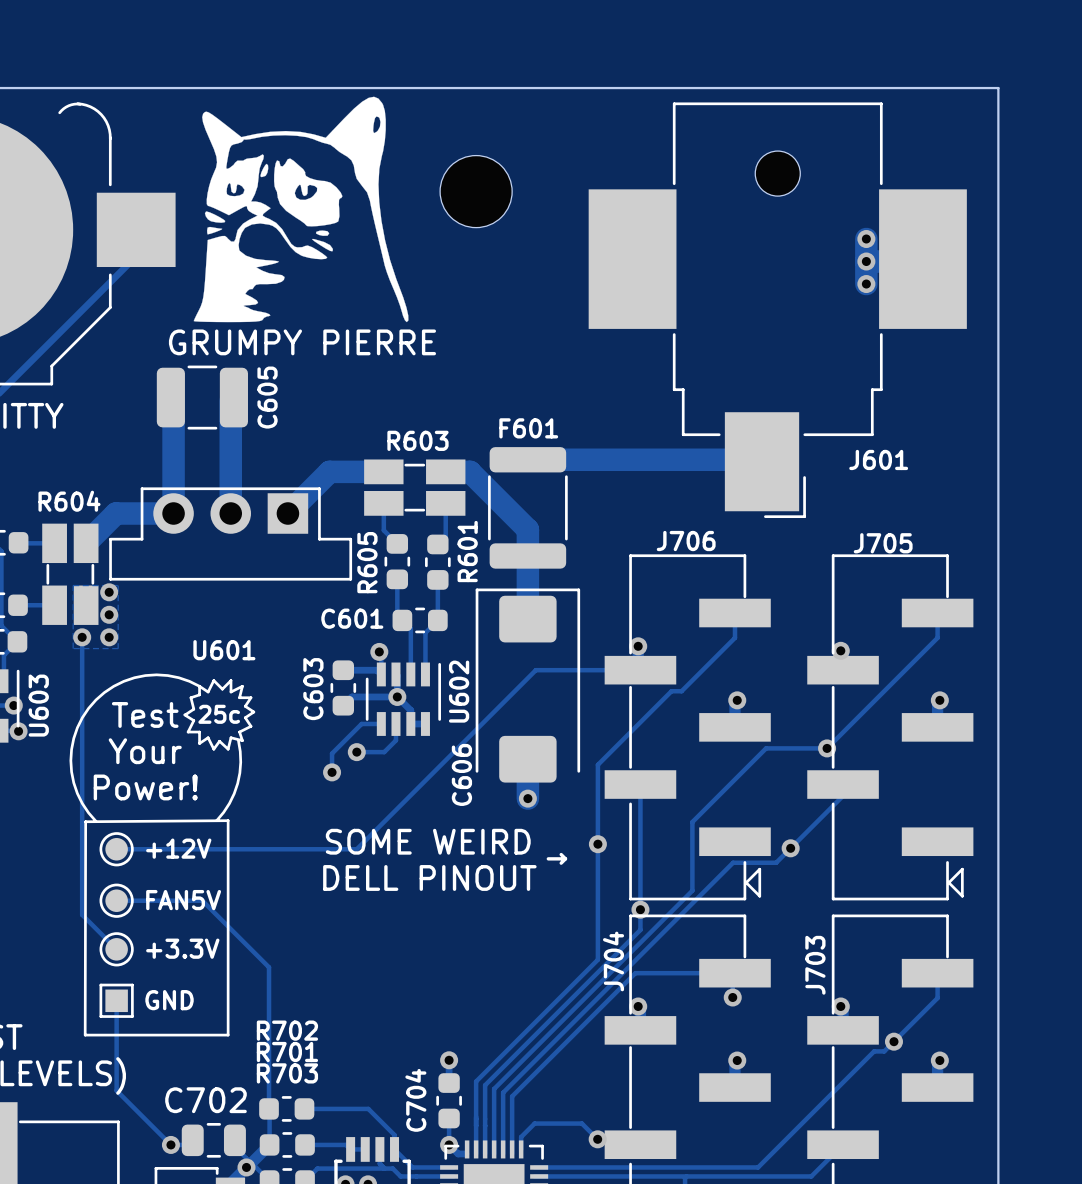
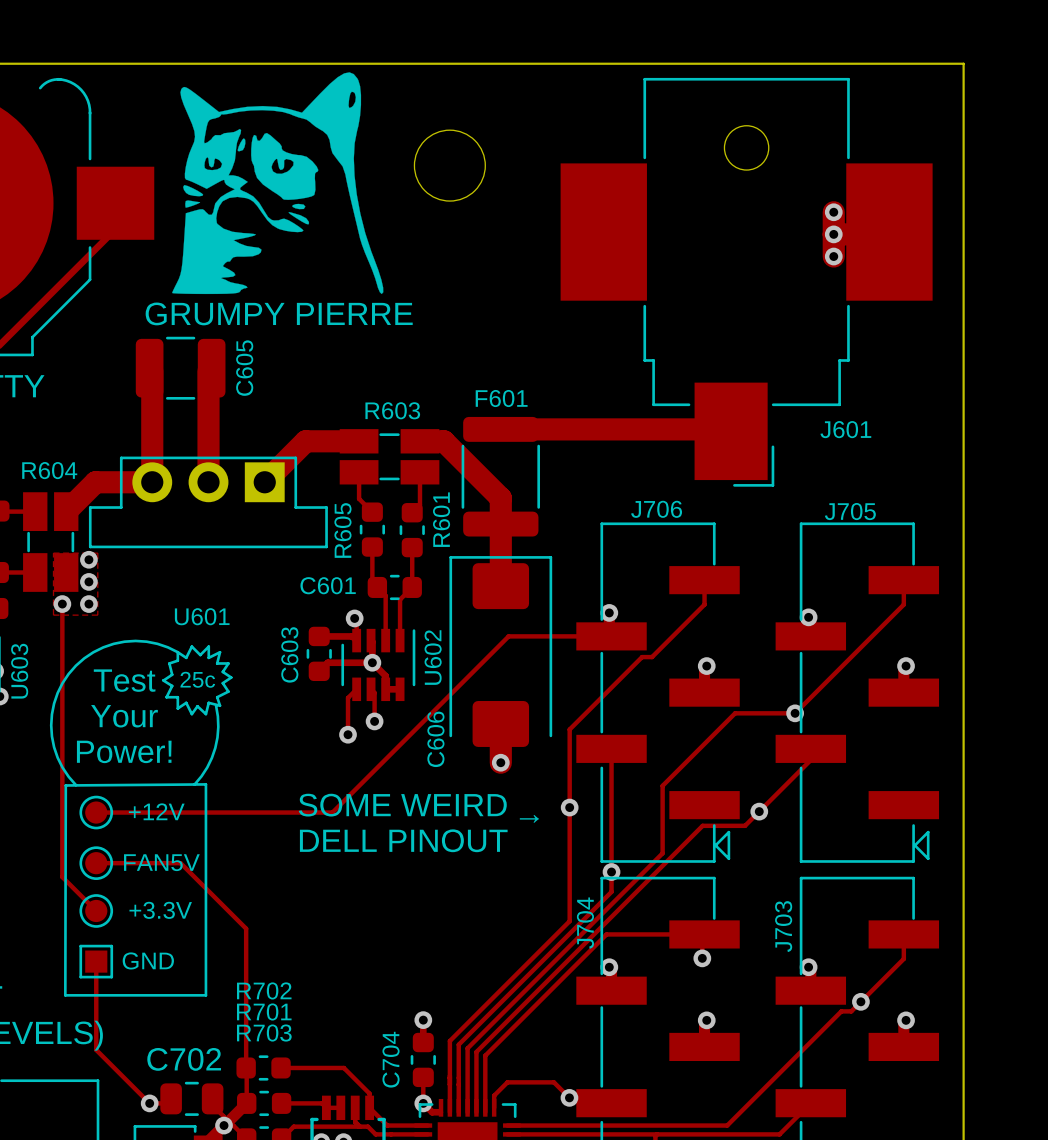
track: (381, 723) (361, 723) (332, 753) (332, 772) -> (356, 689) (348, 697) (348, 734)
track: (395, 723) (395, 740) (384, 752) (356, 752) -> (371, 689) (374, 692) (374, 721)
via: (356, 752) -> none
via: none -> (374, 721)
via: none -> (348, 734)
via: (332, 772) -> none

